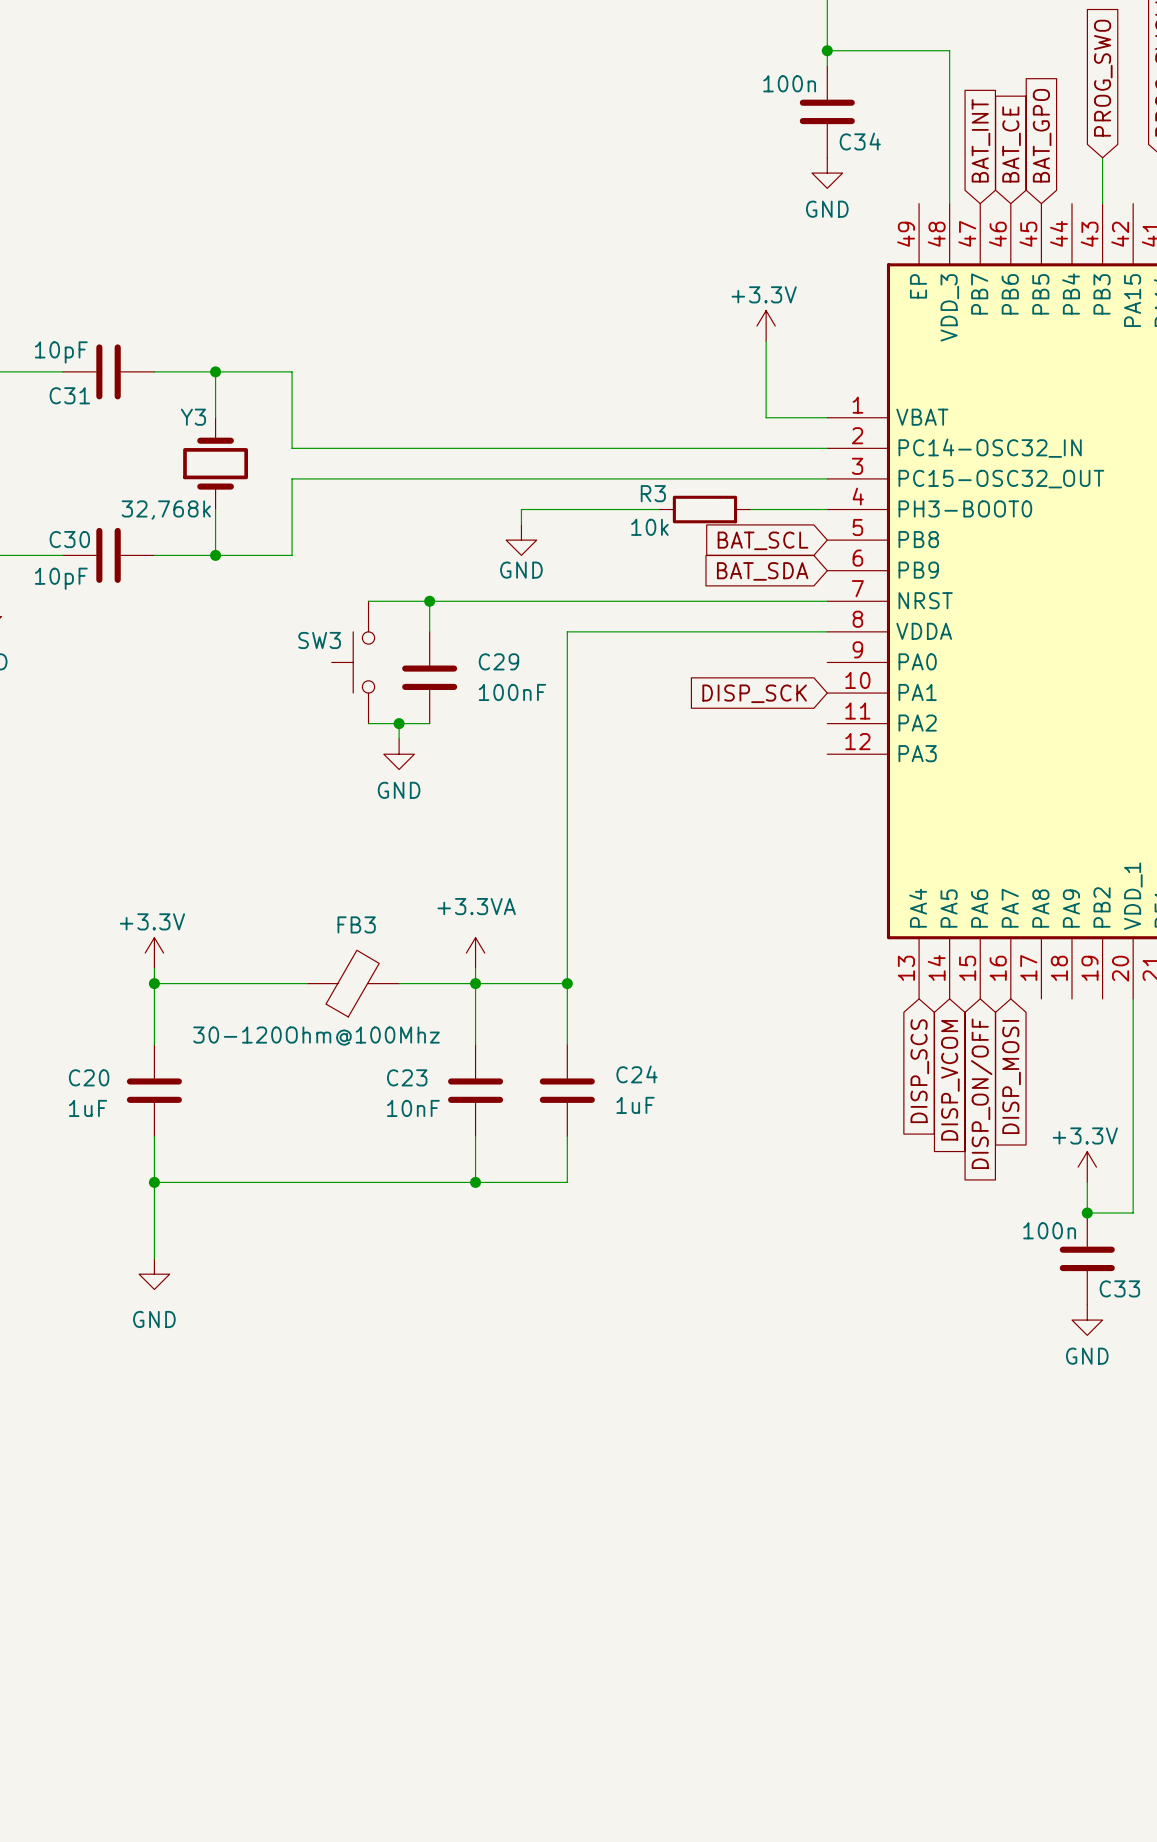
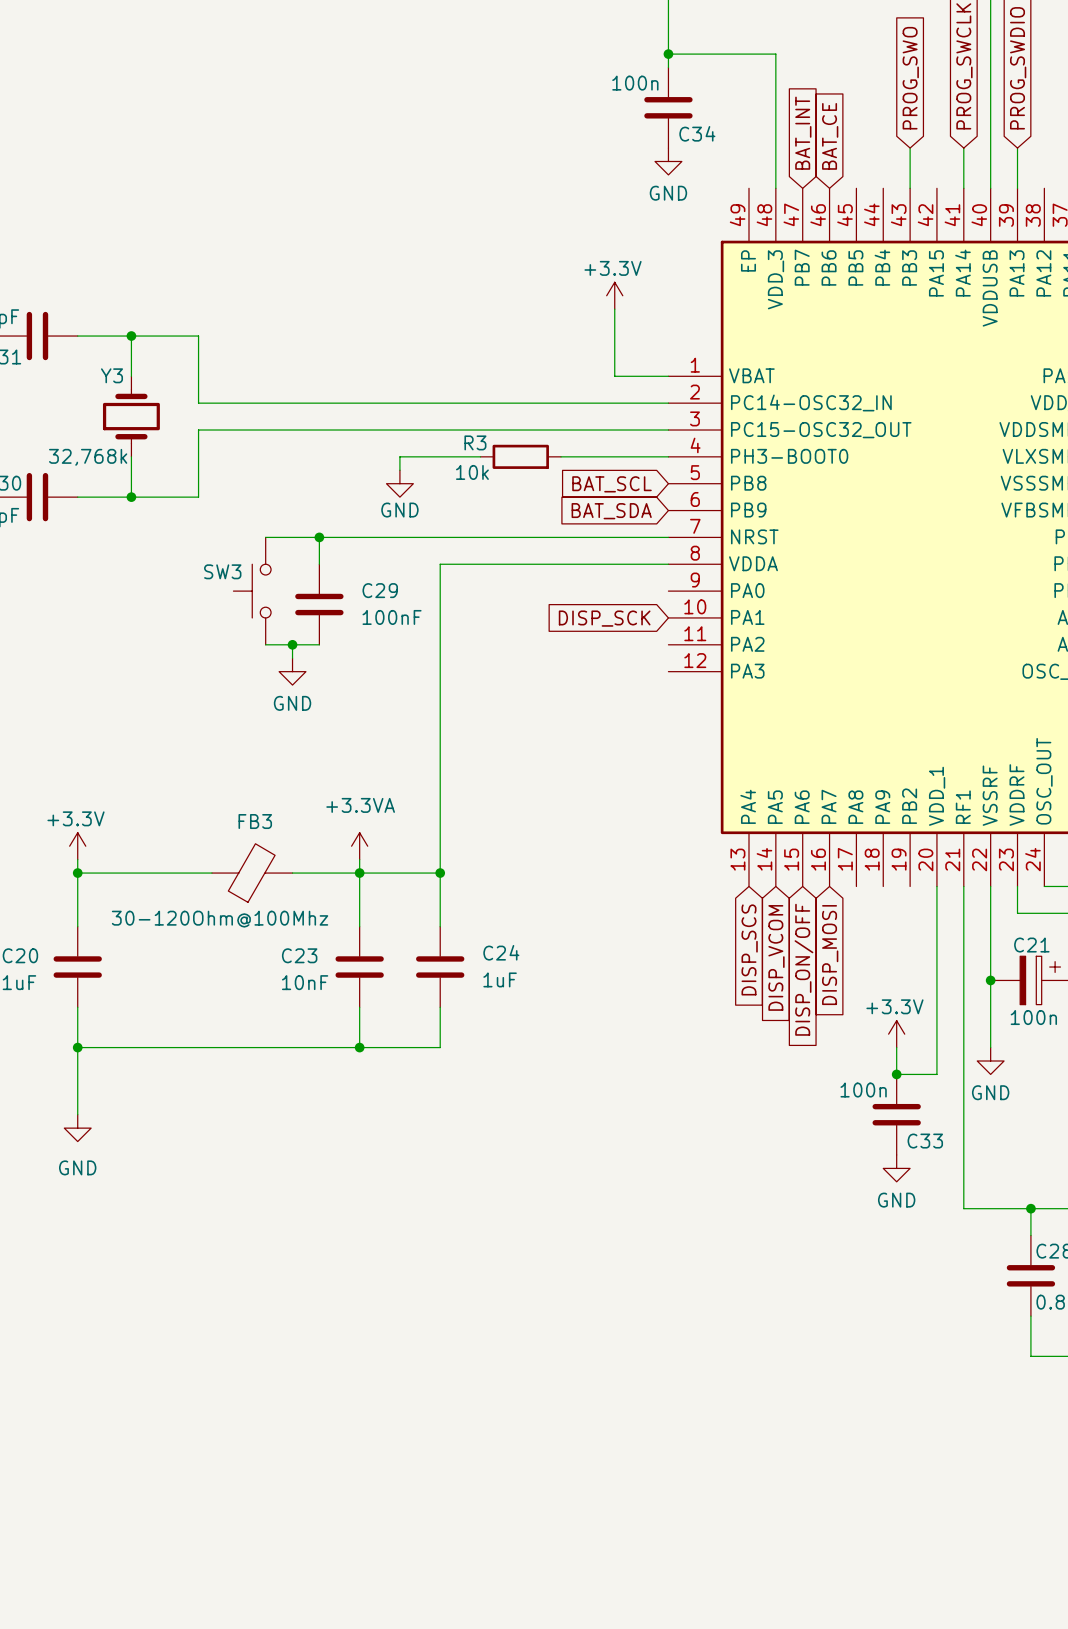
global label: BAT_GPO (1042, 135) -> none
wire: (613, 509) (659, 509) -> (561, 456) (601, 456)
R3 position: (704, 509) -> (520, 456)

